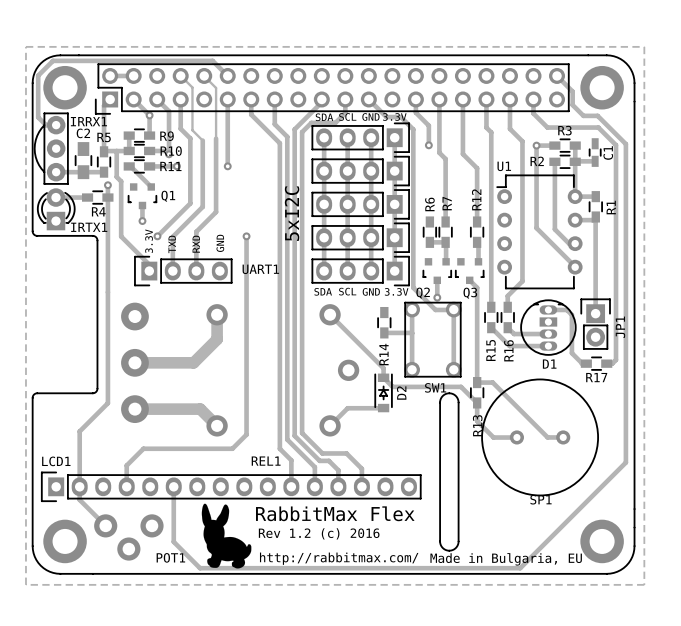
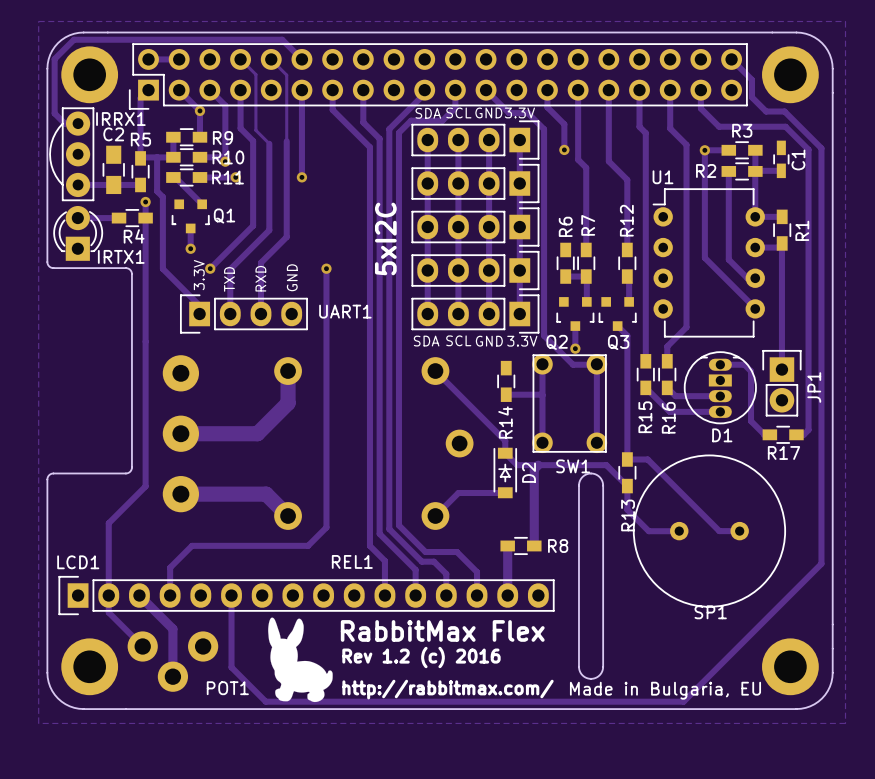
track: none -> (538, 465) (534, 469) (534, 545)
track: none -> (507, 545) (507, 595)
R8: none -> (520, 545)
track: none -> (139, 595) (172, 629) (172, 676)

